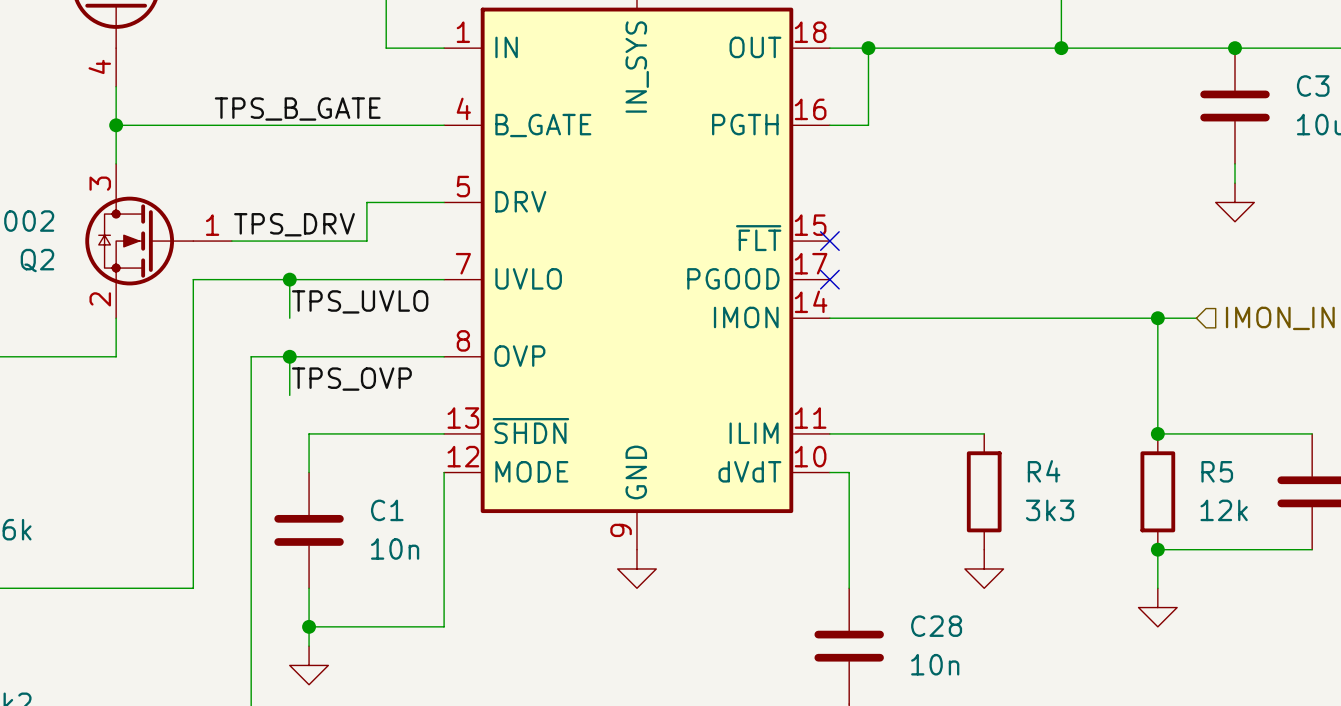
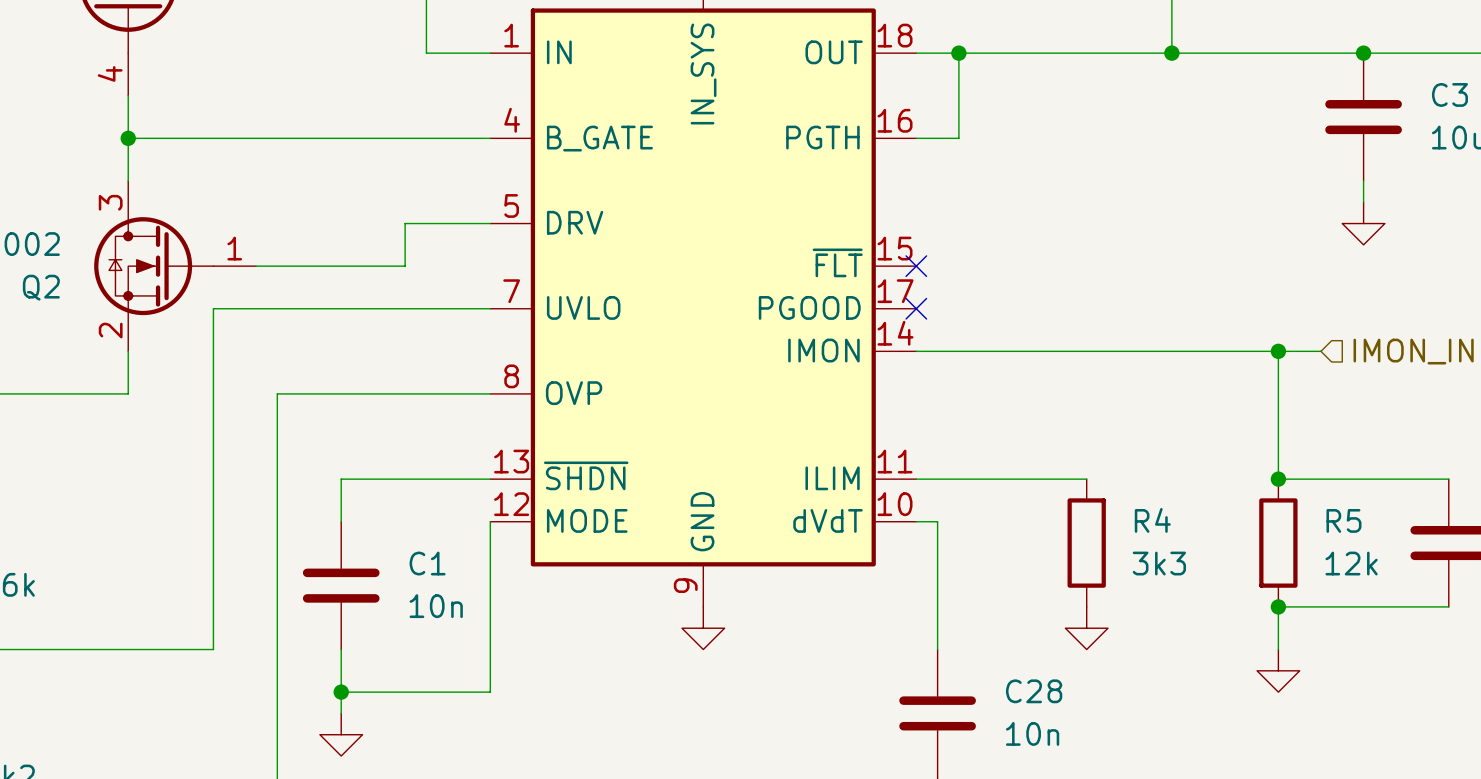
label: TPS_B_GATE (297, 109) -> none
label: TPS_DRV (294, 224) -> none
wire: (289, 279) (289, 318) -> none
junction: (289, 279) -> none
label: TPS_UVLO (360, 301) -> none
wire: (289, 356) (289, 395) -> none
junction: (289, 356) -> none
label: TPS_OVP (351, 379) -> none

